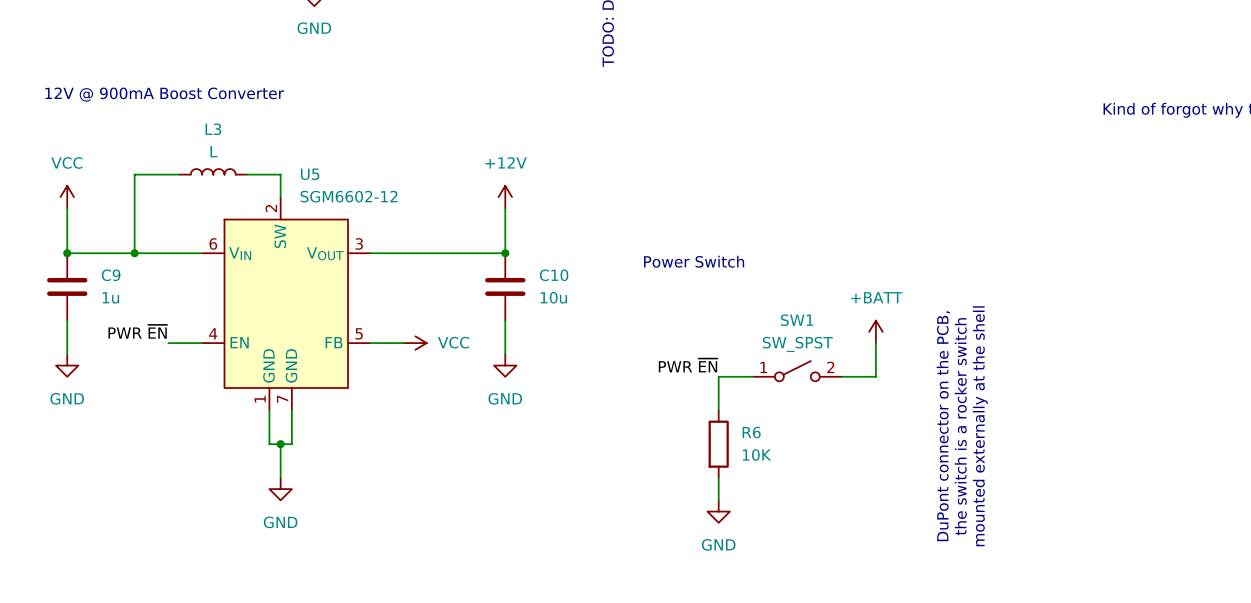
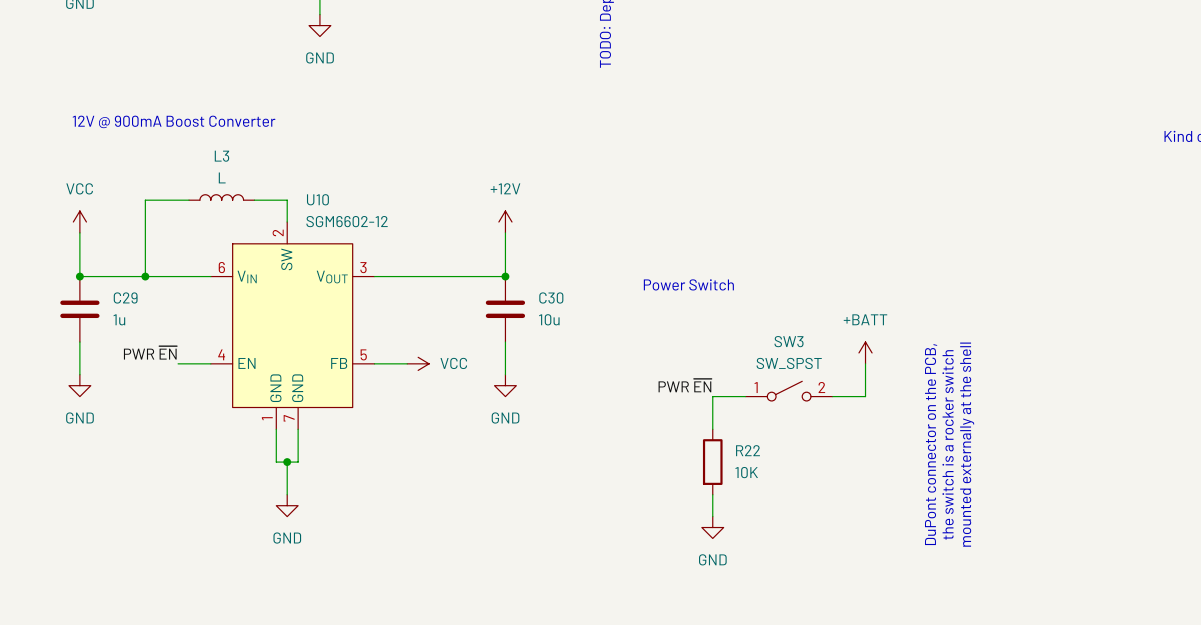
U5 name: U5 (310, 174) -> U10 (317, 199)
C9 name: C9 (111, 275) -> C29 (125, 297)
C10 name: C10 (554, 275) -> C30 (551, 297)
SW1 name: SW1 (797, 320) -> SW3 (789, 341)
R6 name: R6 (751, 432) -> R22 (747, 450)

